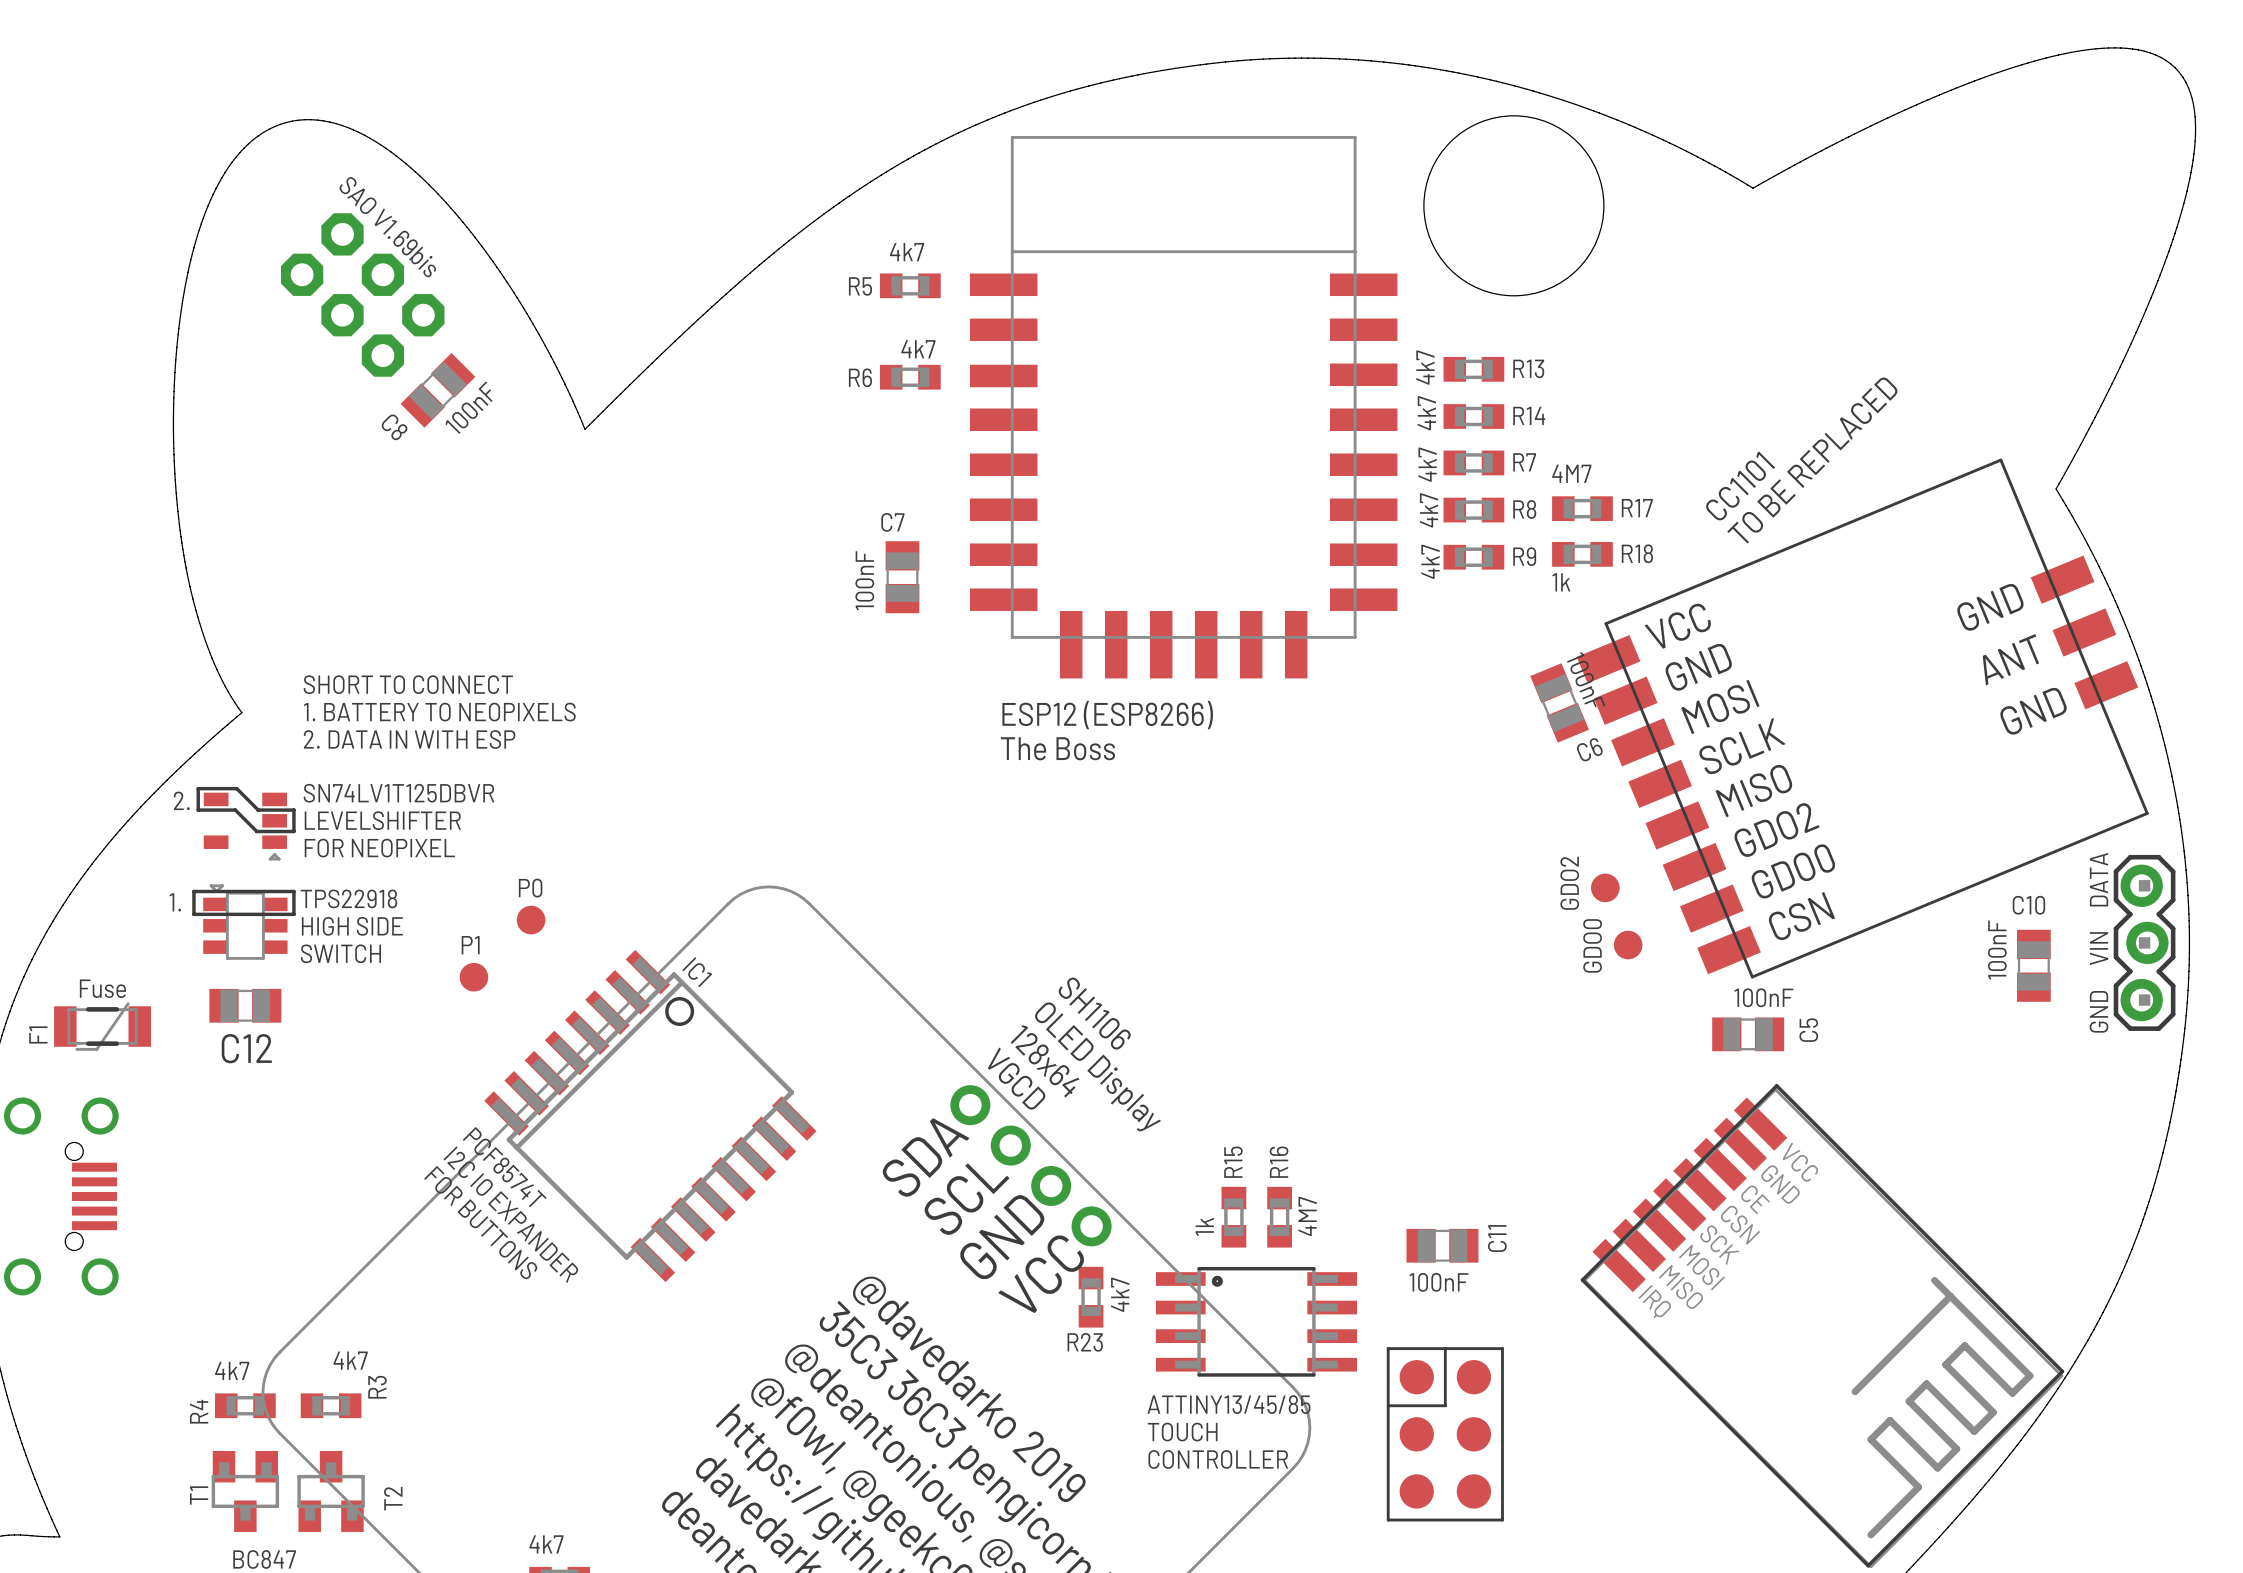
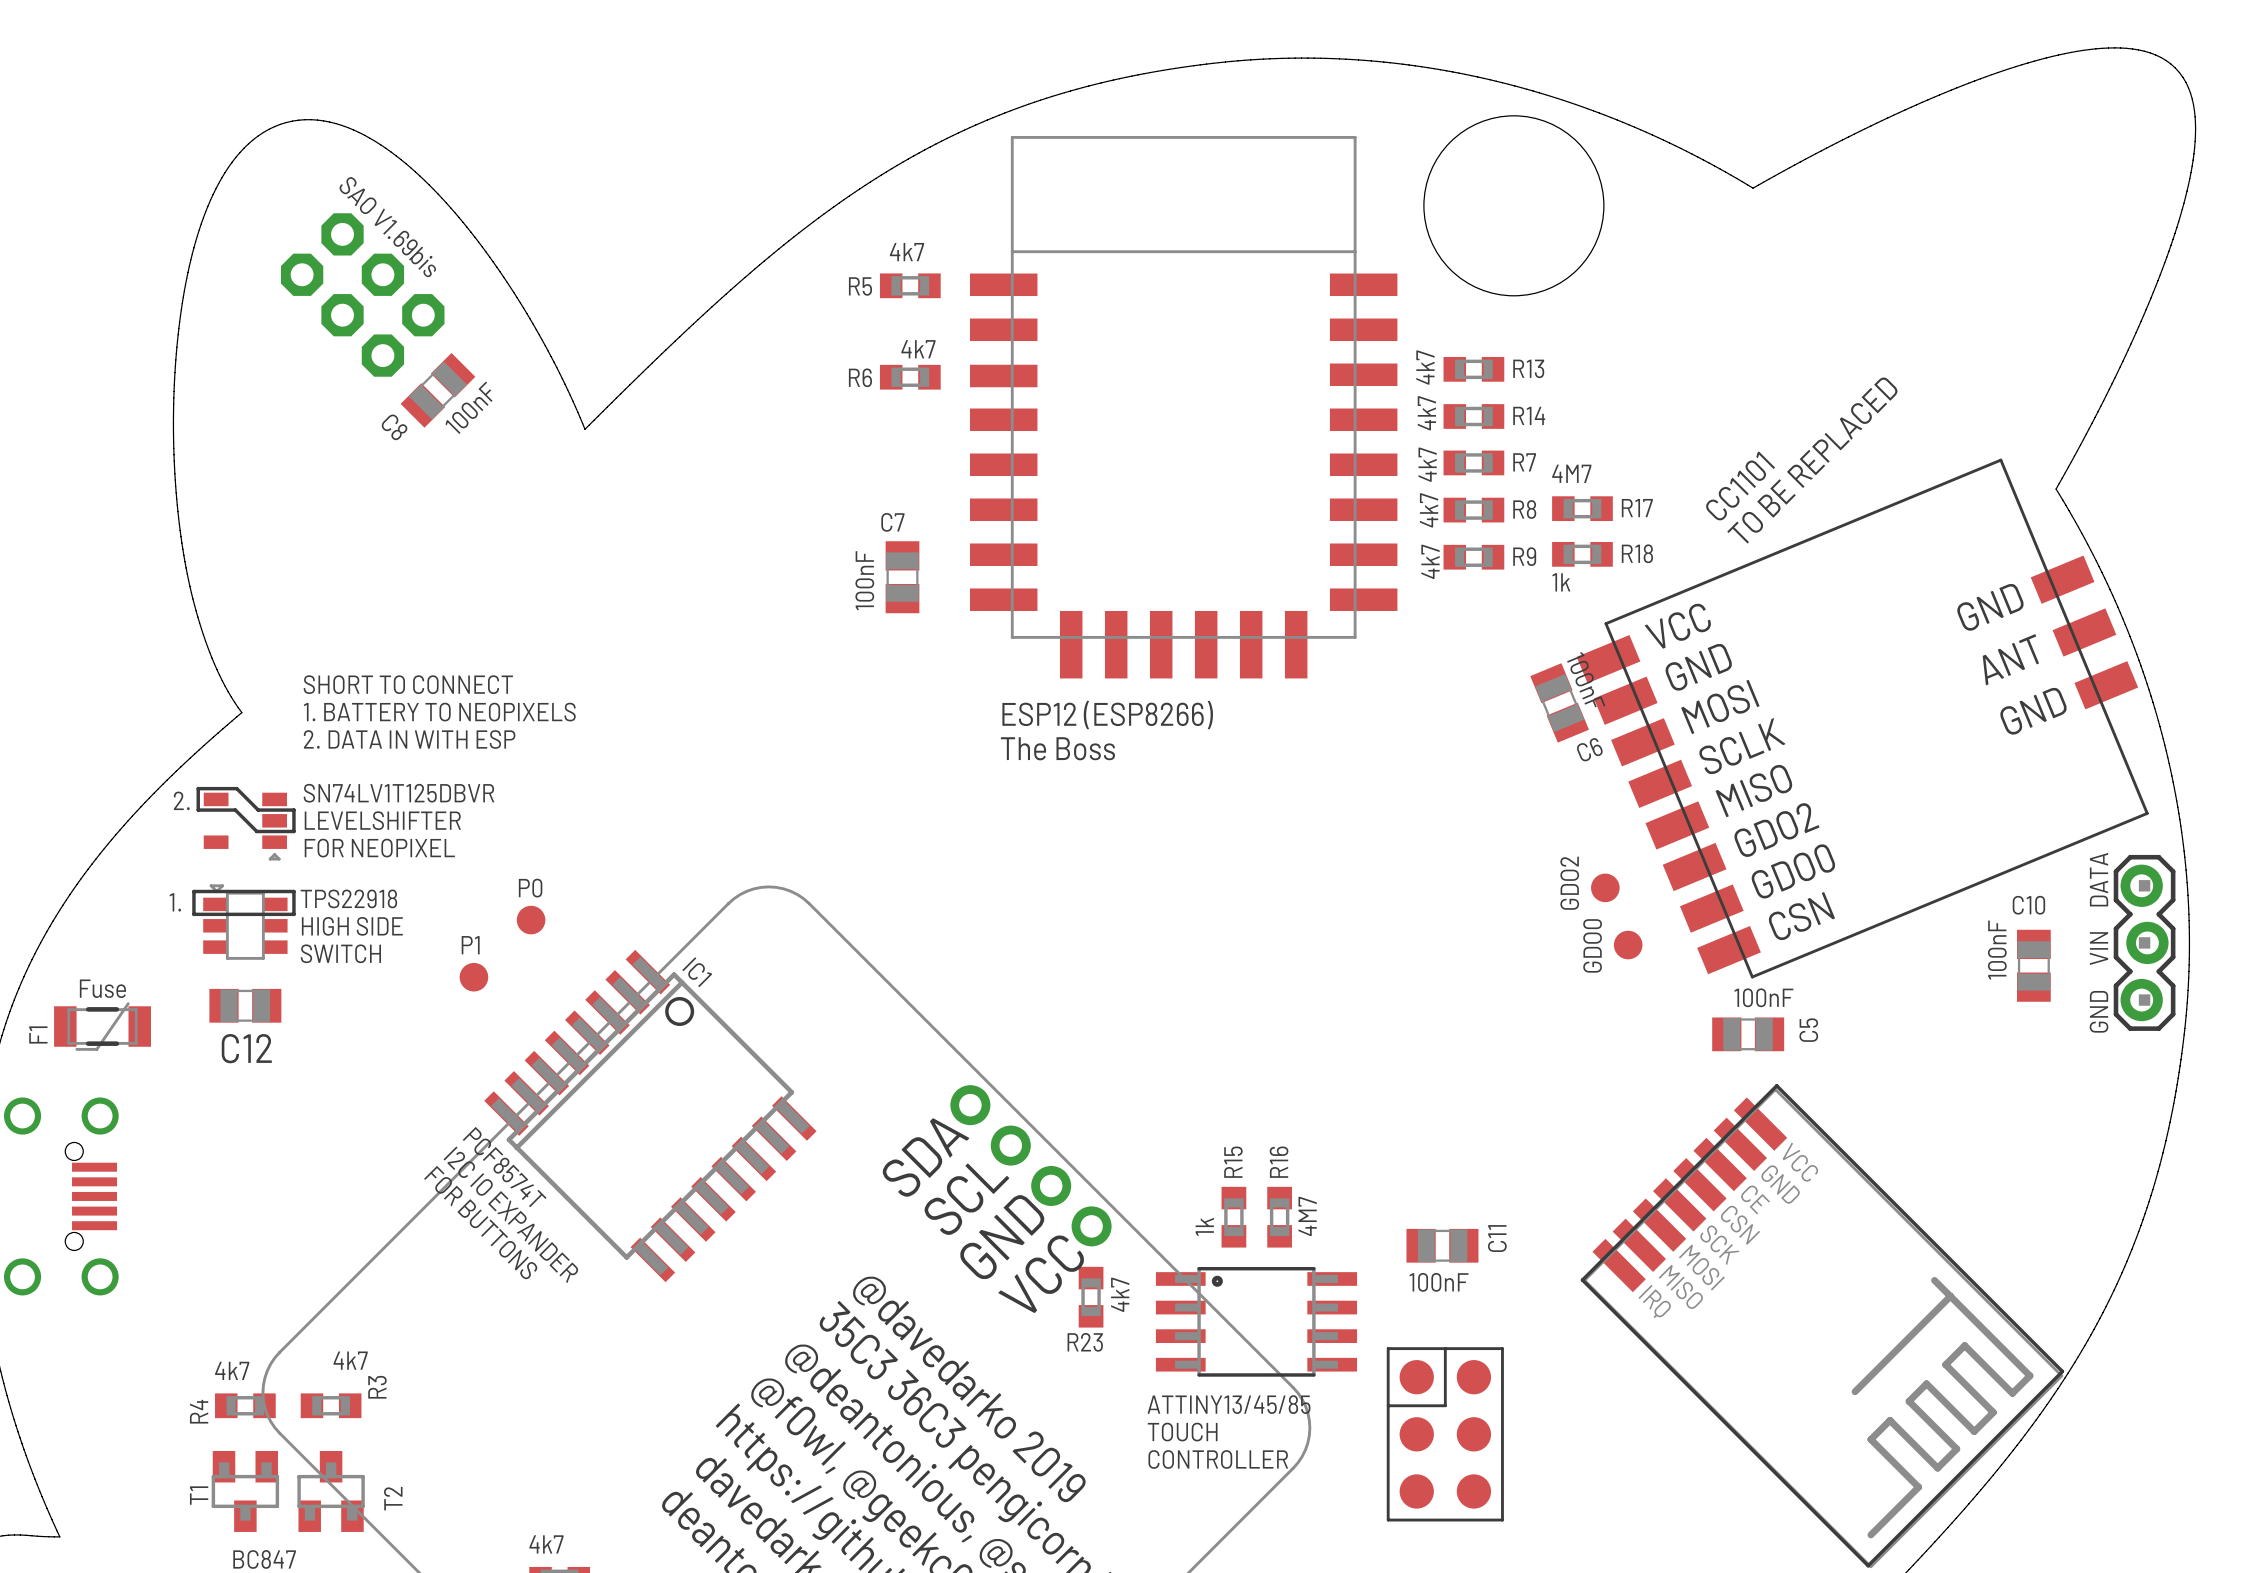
text: SH1106 (1094, 1013) -> none
text: 128x64 (1045, 1061) -> none
text: OLED Display (1097, 1066) -> none
text: VGCD (1016, 1078) -> none

